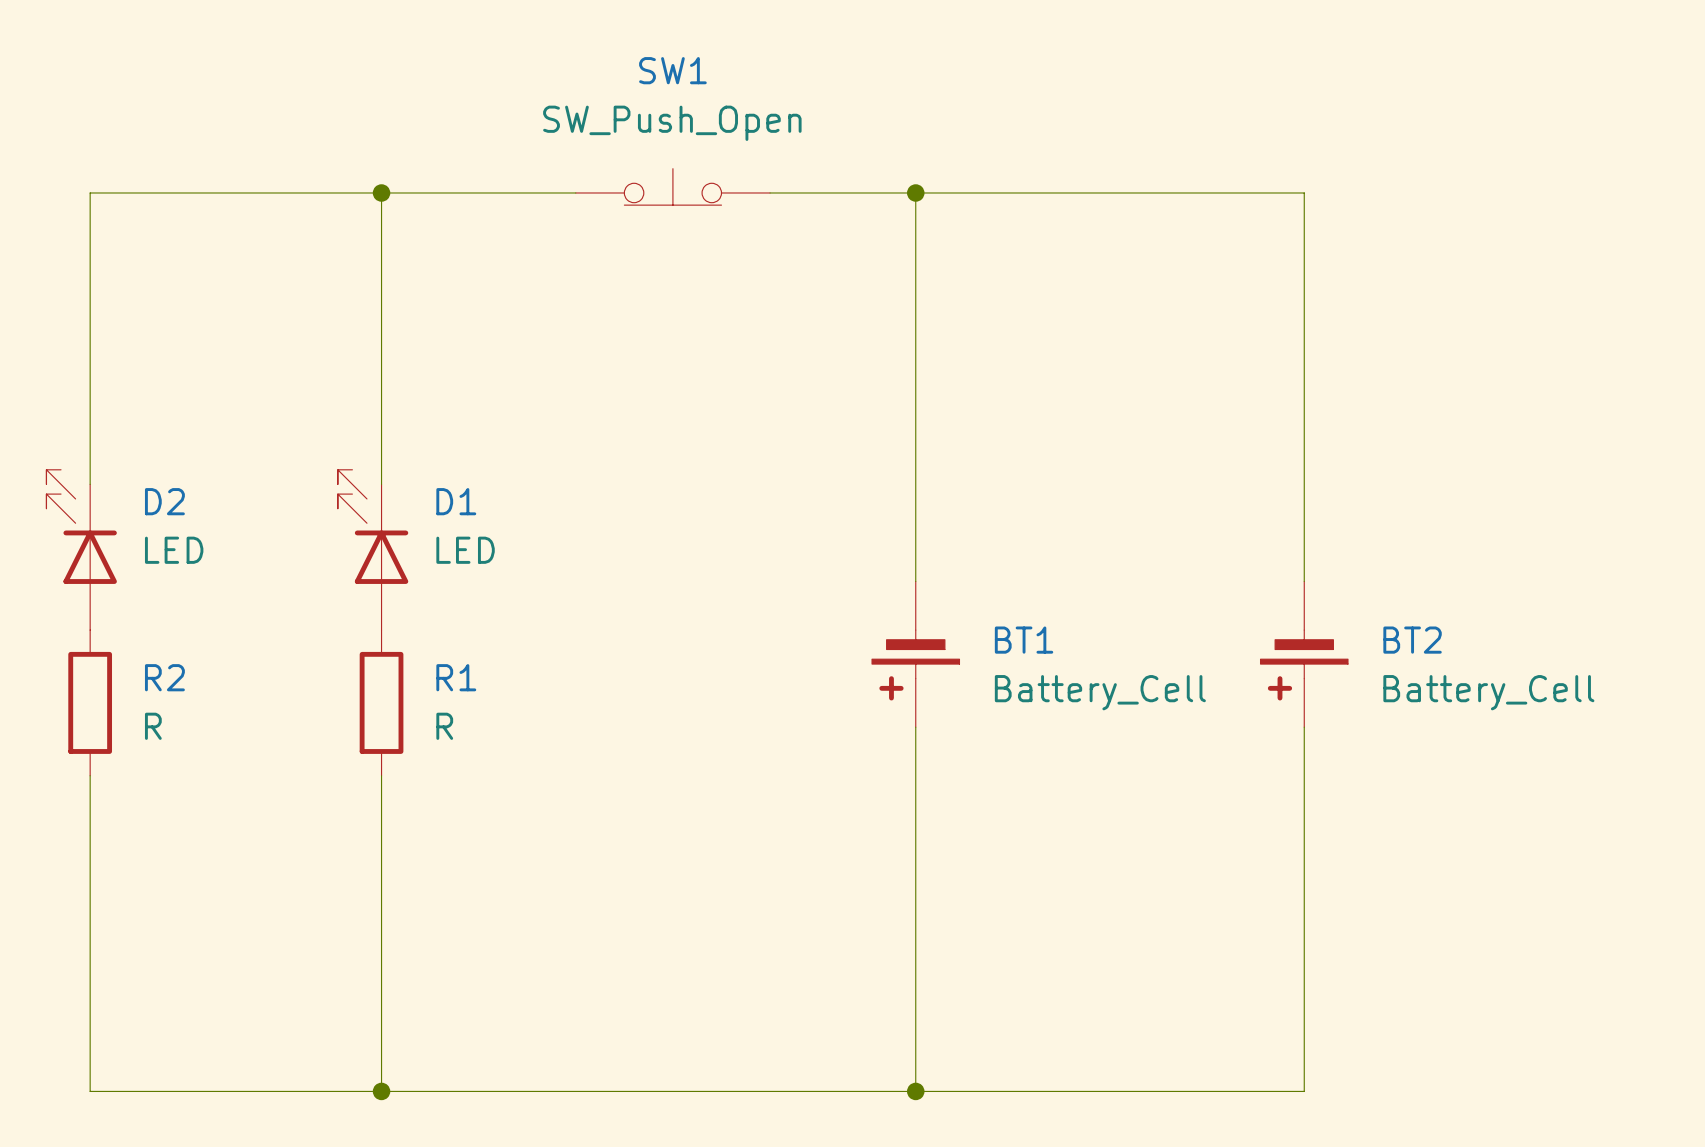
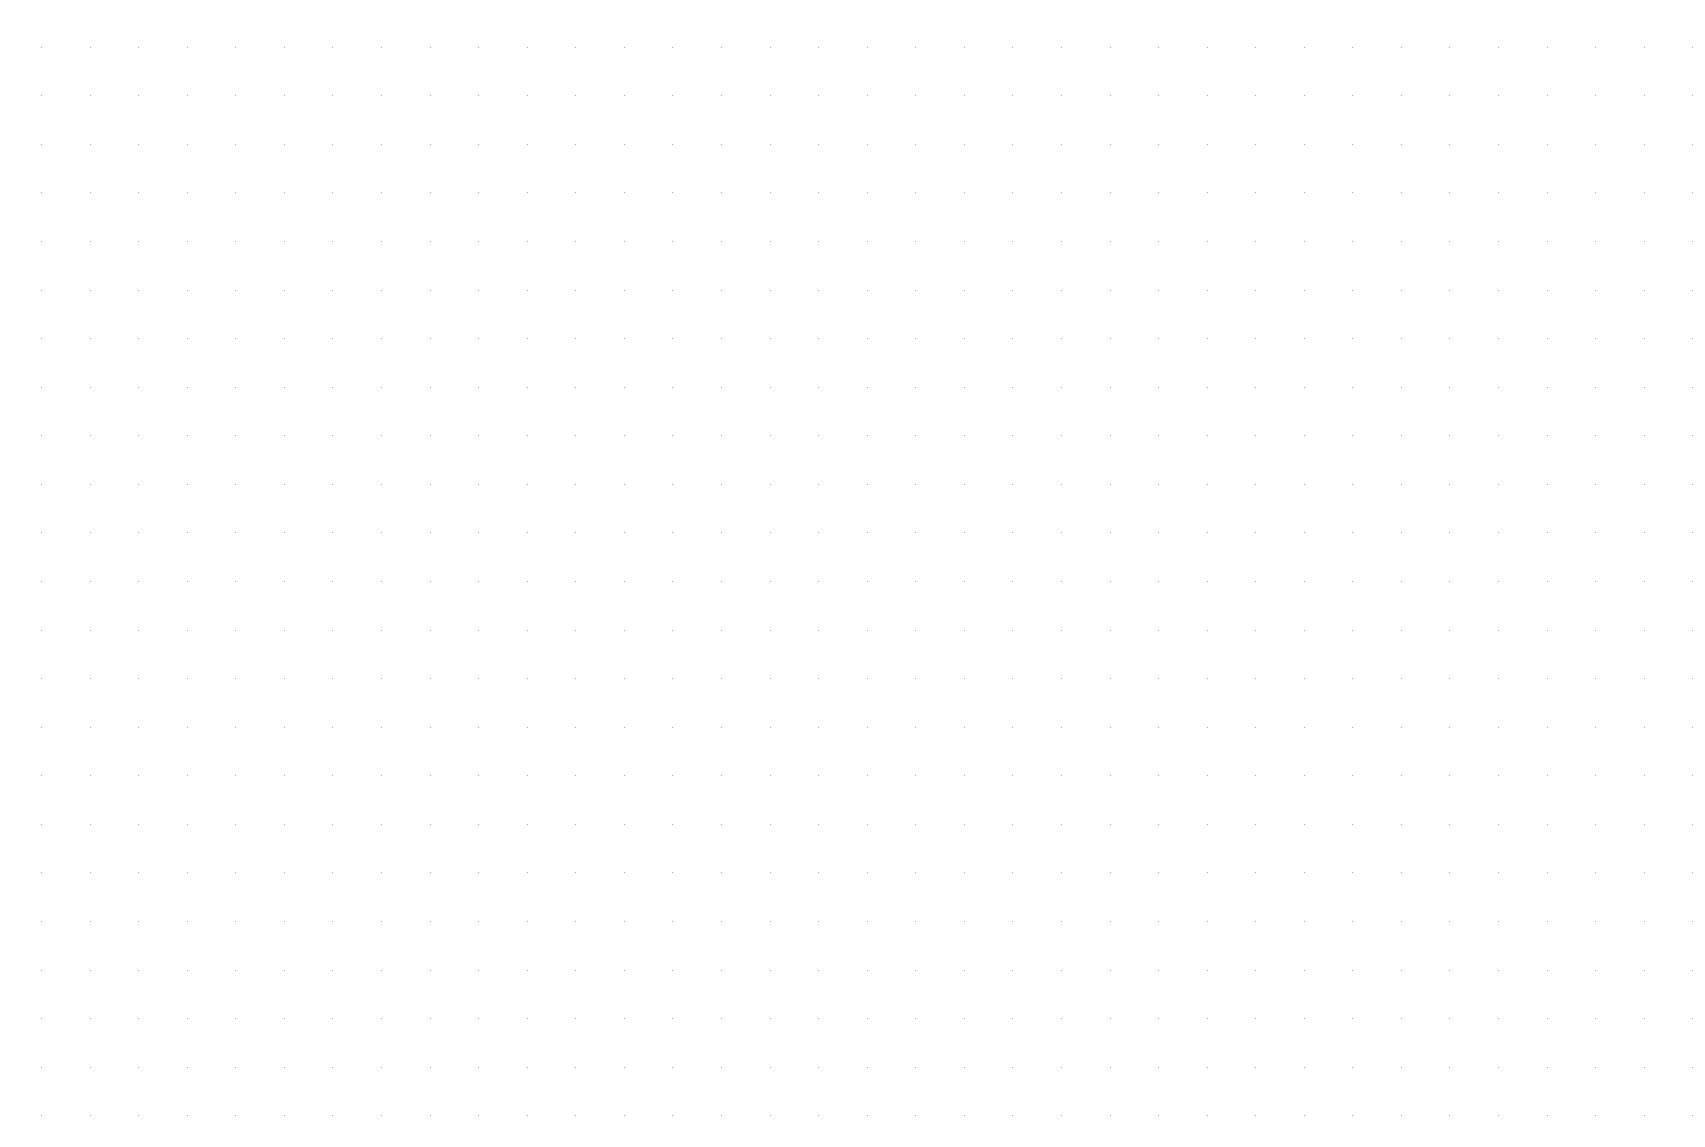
SW1: SW_Push_Open (672, 186) -> none
wire: (381, 192) (381, 484) -> none
junction: (381, 192) -> none
wire: (575, 192) (90, 192) (90, 484) -> none
wire: (770, 192) (1304, 192) (1304, 581) -> none
wire: (915, 192) (915, 581) -> none
junction: (915, 192) -> none
D2: LED (81, 549) -> none
D1: LED (373, 549) -> none
BT1: Battery_Cell (915, 654) -> none
BT2: Battery_Cell (1304, 654) -> none
R2: R (90, 702) -> none
R1: R (381, 702) -> none
wire: (915, 727) (915, 1091) -> none
wire: (1304, 727) (1304, 1091) (90, 1091) (90, 775) -> none
wire: (381, 775) (381, 1091) -> none
junction: (381, 1091) -> none
junction: (915, 1091) -> none

